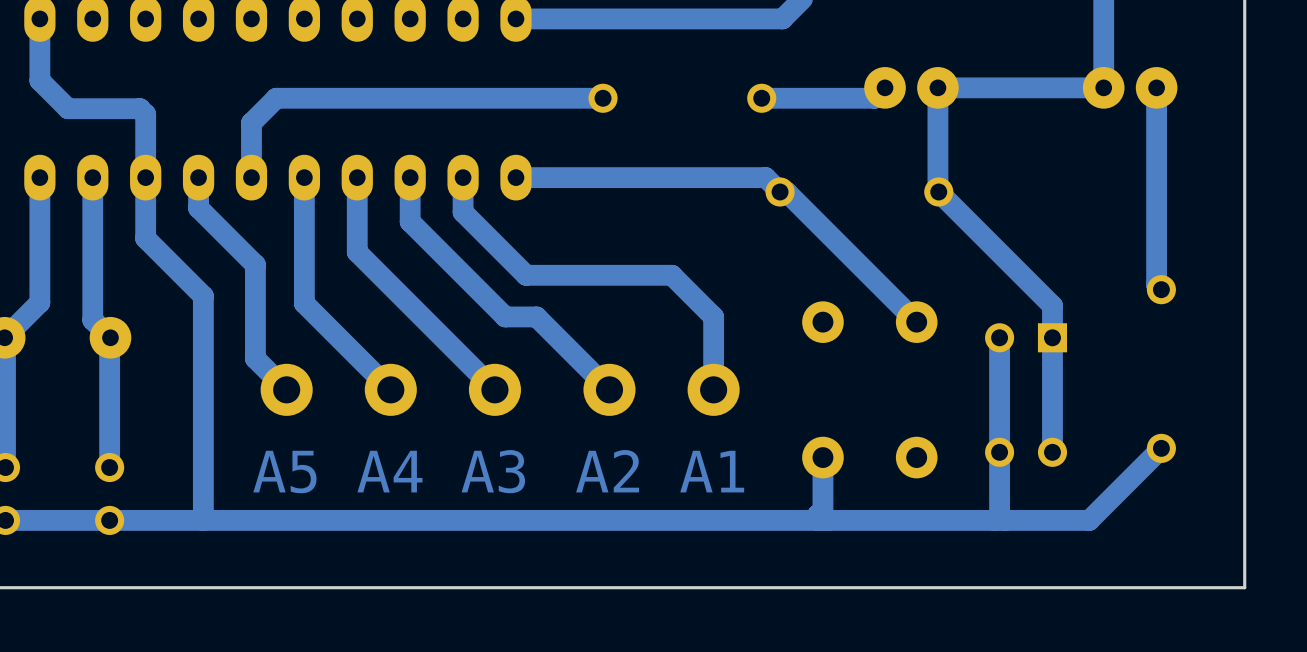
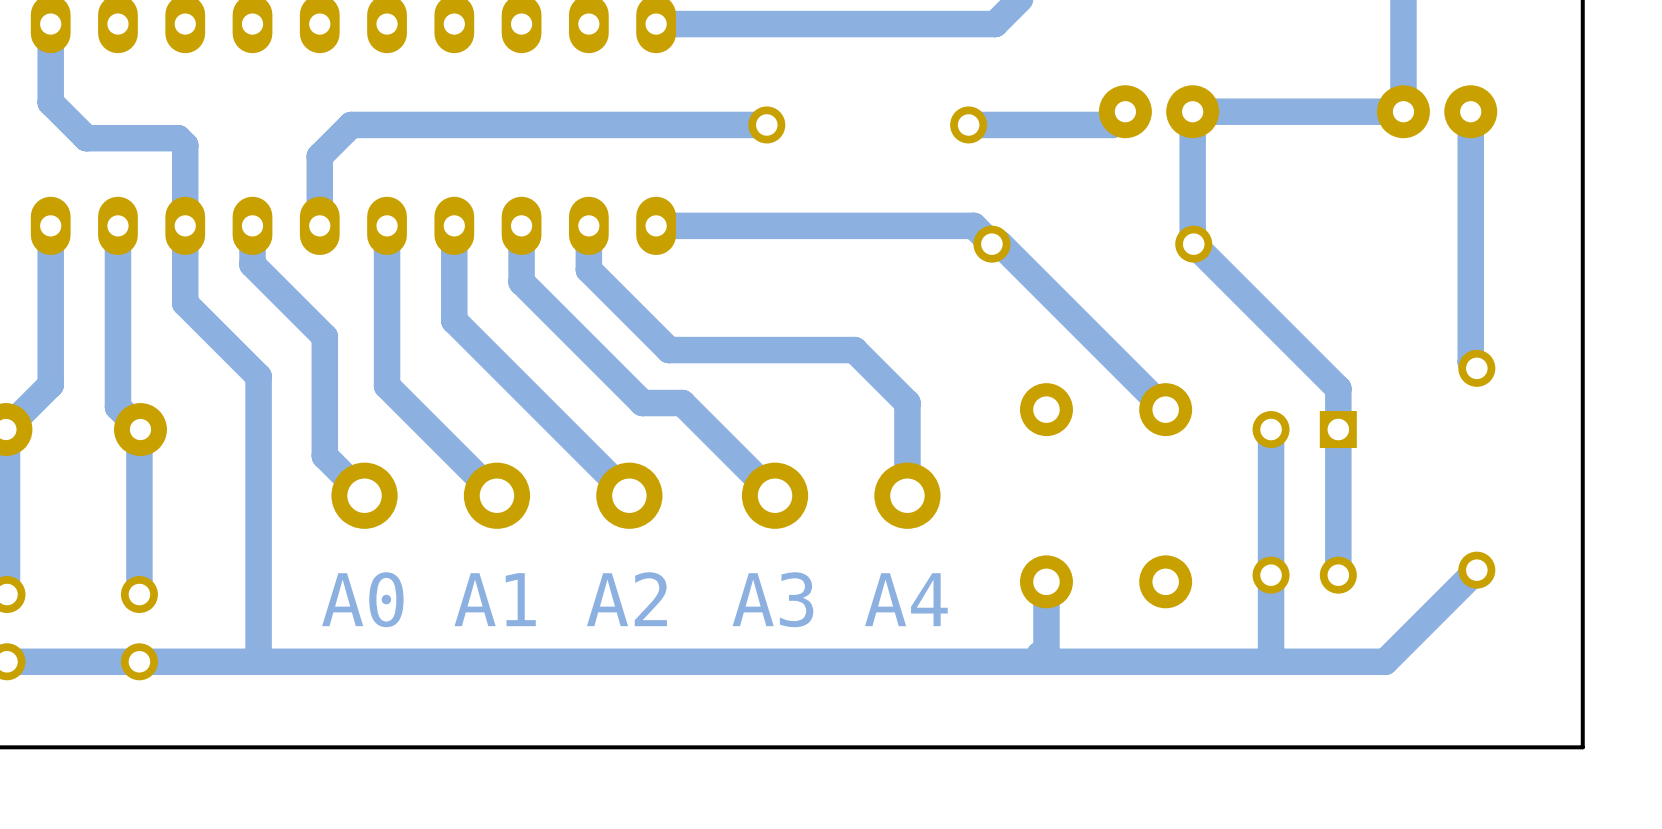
text: A4 (389, 471) -> A1 (495, 599)
text: A3 (493, 471) -> A2 (626, 599)
text: A2 (607, 471) -> A3 (772, 599)
text: A1 (712, 471) -> A4 (906, 599)
text: A5 (284, 472) -> A0 (362, 599)

